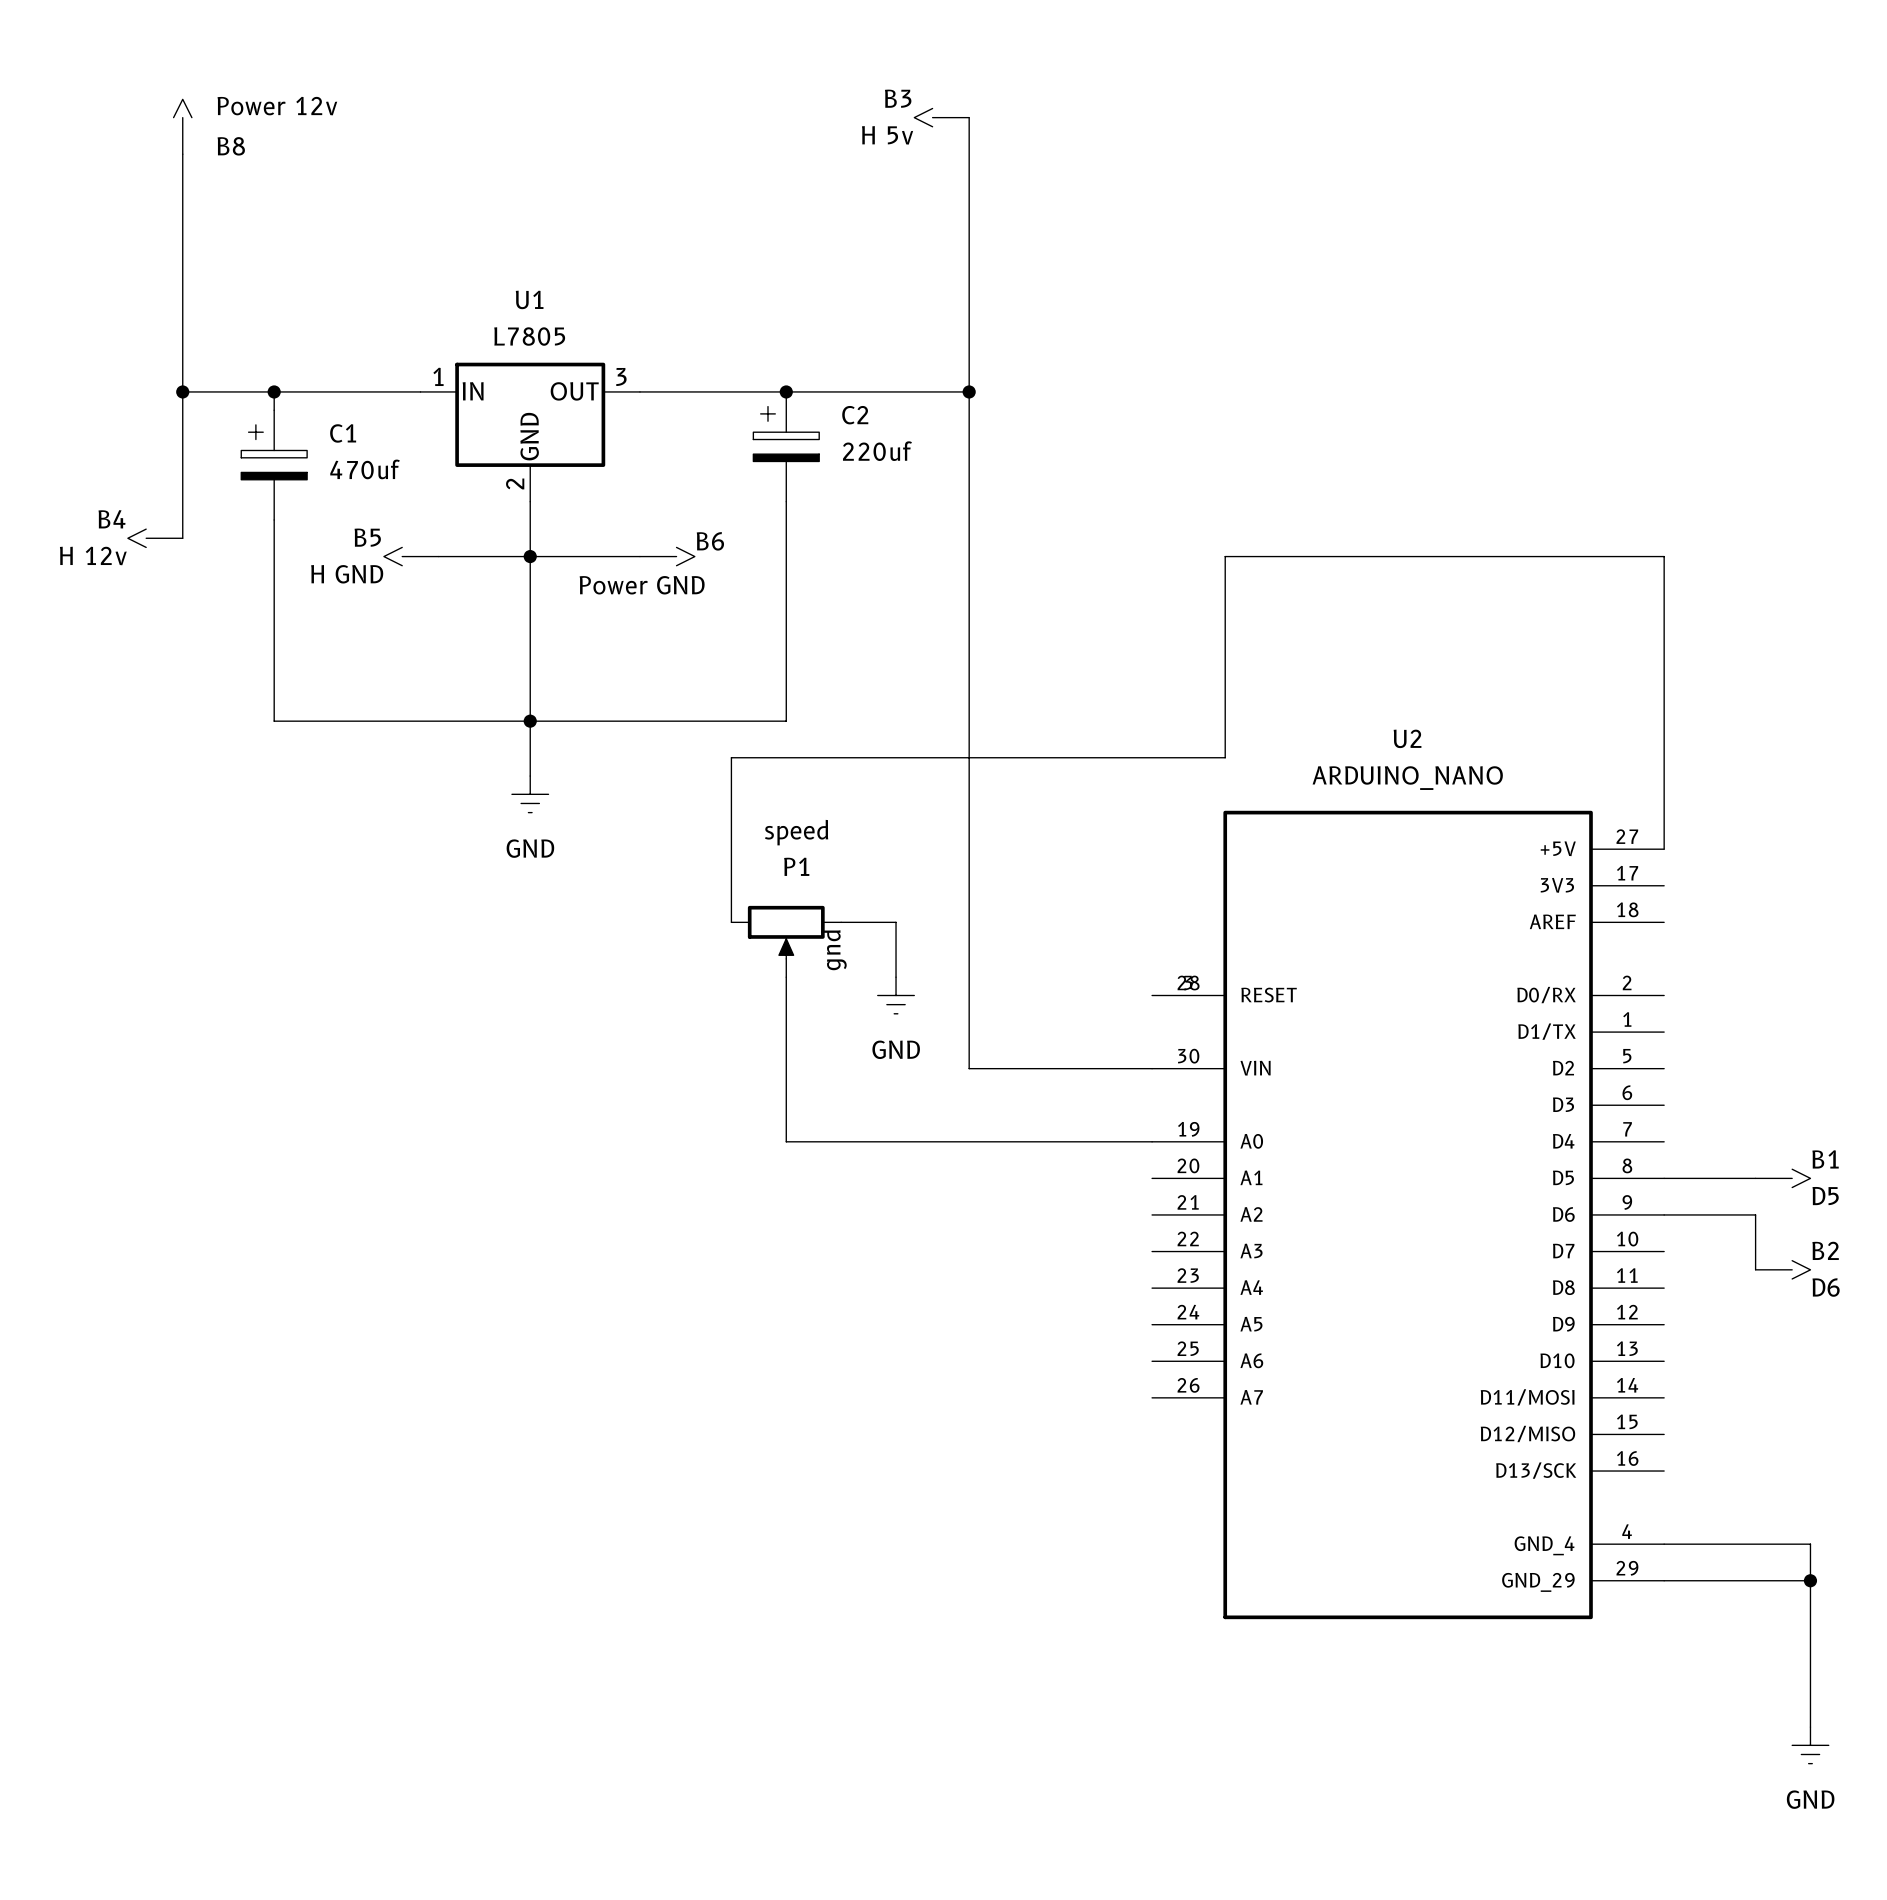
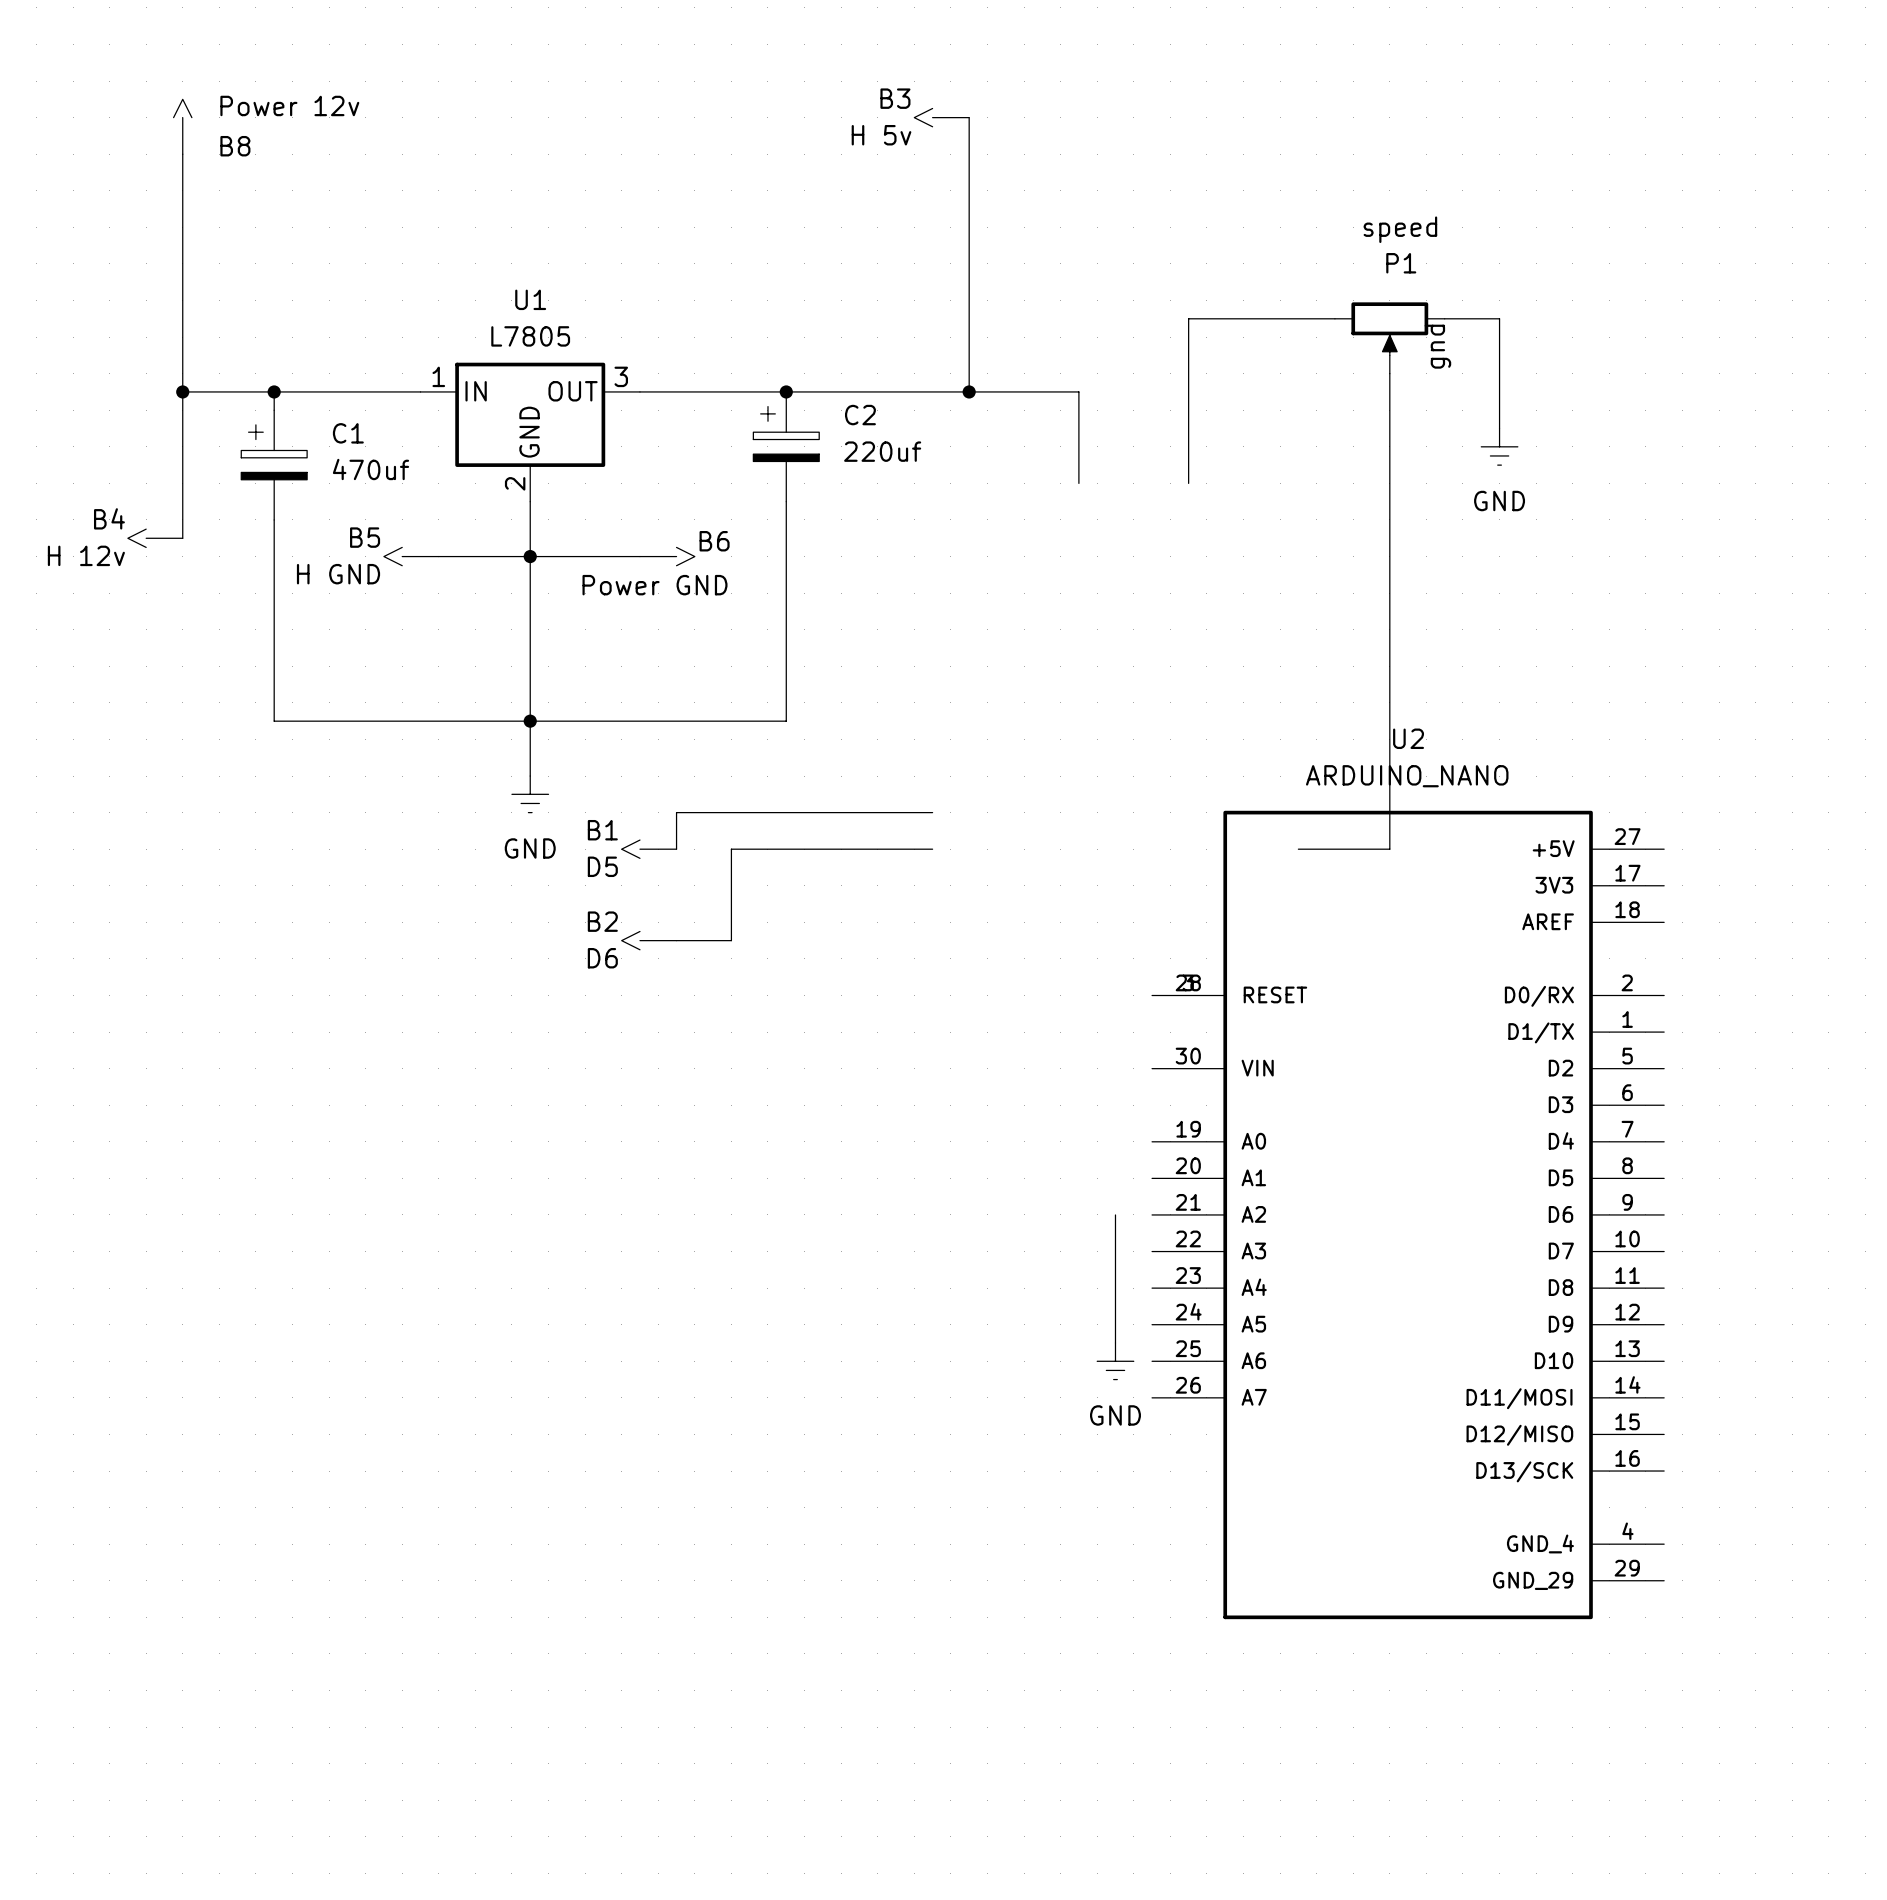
wire: none -> (1334, 318) (1188, 318) (1188, 483)
wire: none -> (1444, 318) (1499, 318) (1499, 428)
wire: none -> (1389, 373) (1389, 849) (1298, 849)
wire: (969, 391) (969, 1068) (1152, 1068) -> (969, 391) (1078, 391) (1078, 483)
power symbol: none -> GND (1499, 446)
wire: none -> (932, 812) (676, 812) (676, 849)
wire: (731, 849) (731, 757) (1225, 757) (1225, 556) (1664, 556) (1664, 849) -> (731, 849) (932, 849)
wire: none -> (731, 922) (731, 940) (676, 940)
wire: (841, 922) (896, 922) (896, 977) -> none
P1 position: (786, 941) -> (1389, 338)
wire: (786, 977) (786, 1141) (1152, 1141) -> none
power symbol: GND (896, 995) -> none
B1 name position: B1 (1825, 1159) -> B1 (602, 830)
wire: (1664, 1178) (1755, 1178) -> none
B1 rotation: 0° (1783, 1178) -> 180° (649, 849)
B1 position: (1783, 1178) -> (649, 849)
B1 value position: D5 (1825, 1196) -> D5 (602, 866)
wire: none -> (1115, 1214) (1115, 1342)
wire: (1664, 1214) (1755, 1214) (1755, 1269) -> none
B2 name position: B2 (1825, 1250) -> B2 (602, 921)
B2 rotation: 0° (1783, 1269) -> 180° (649, 940)
B2 position: (1783, 1269) -> (649, 940)
B2 value position: D6 (1826, 1287) -> D6 (602, 958)
power symbol: none -> GND (1115, 1361)
wire: (1664, 1544) (1810, 1544) (1810, 1727) -> none
wire: (1664, 1580) (1810, 1580) -> none
junction: (1810, 1580) -> none
power symbol: GND (1810, 1745) -> none

